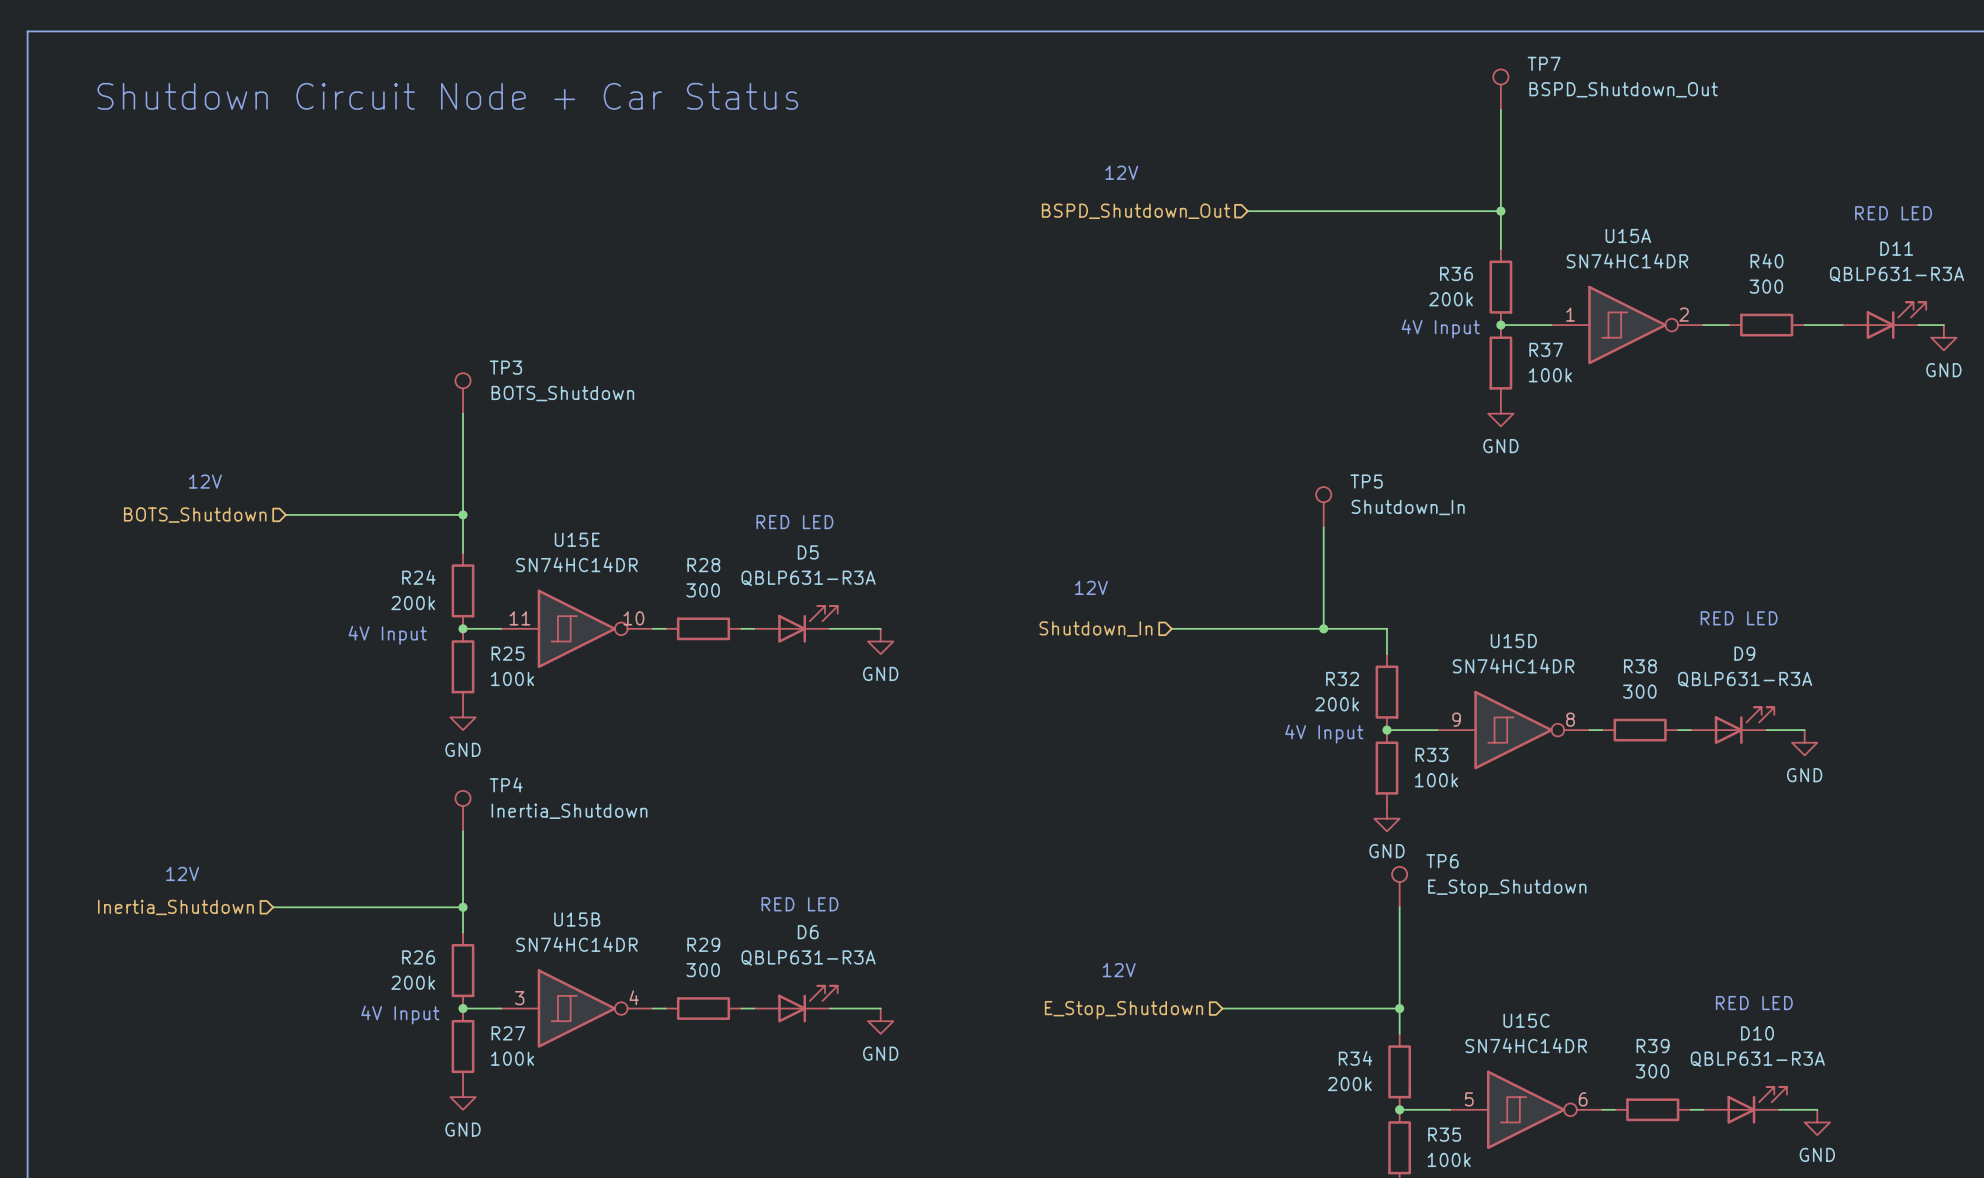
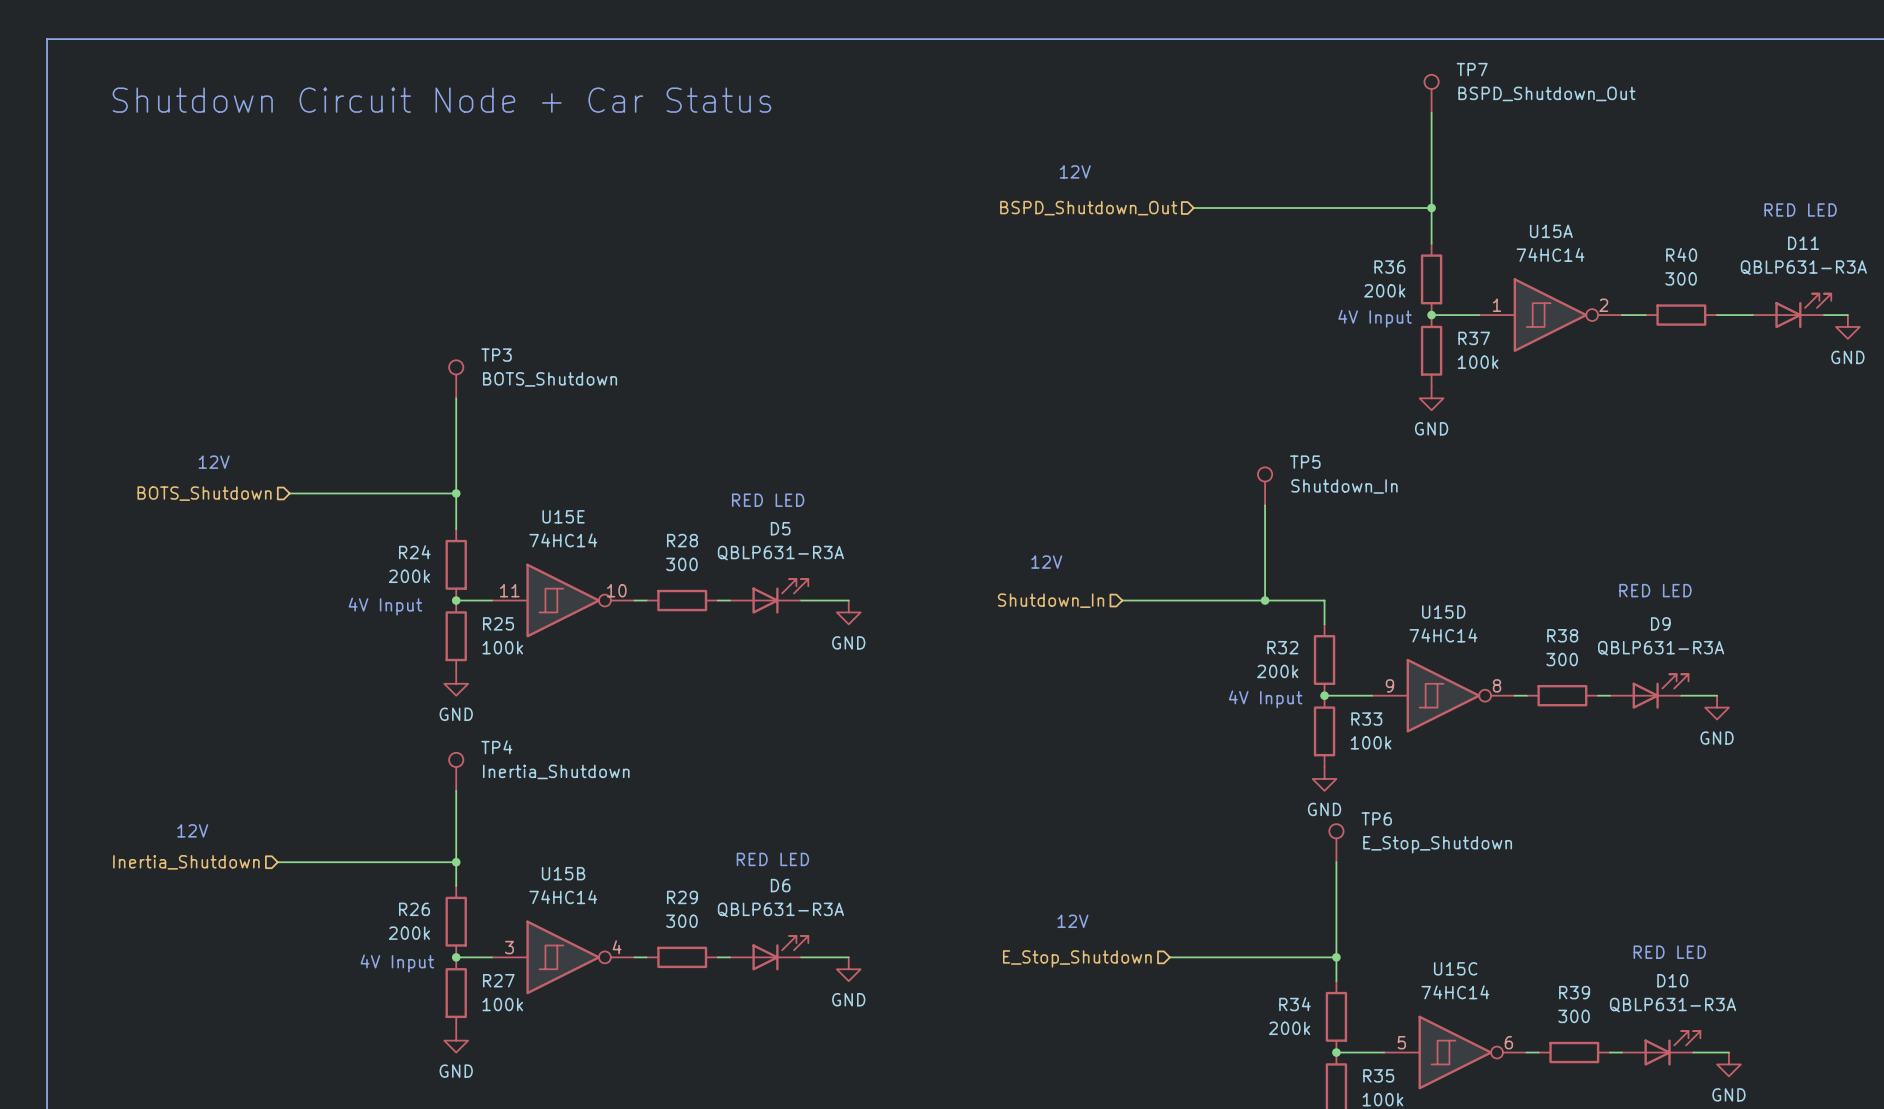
U15A value: SN74HC14DR (1627, 261) -> 74HC14 (1550, 254)
U15E value: SN74HC14DR (576, 564) -> 74HC14 (563, 540)
U15D value: SN74HC14DR (1513, 666) -> 74HC14 (1443, 635)
U15B value: SN74HC14DR (576, 944) -> 74HC14 (563, 897)
U15C value: SN74HC14DR (1526, 1045) -> 74HC14 (1455, 992)

